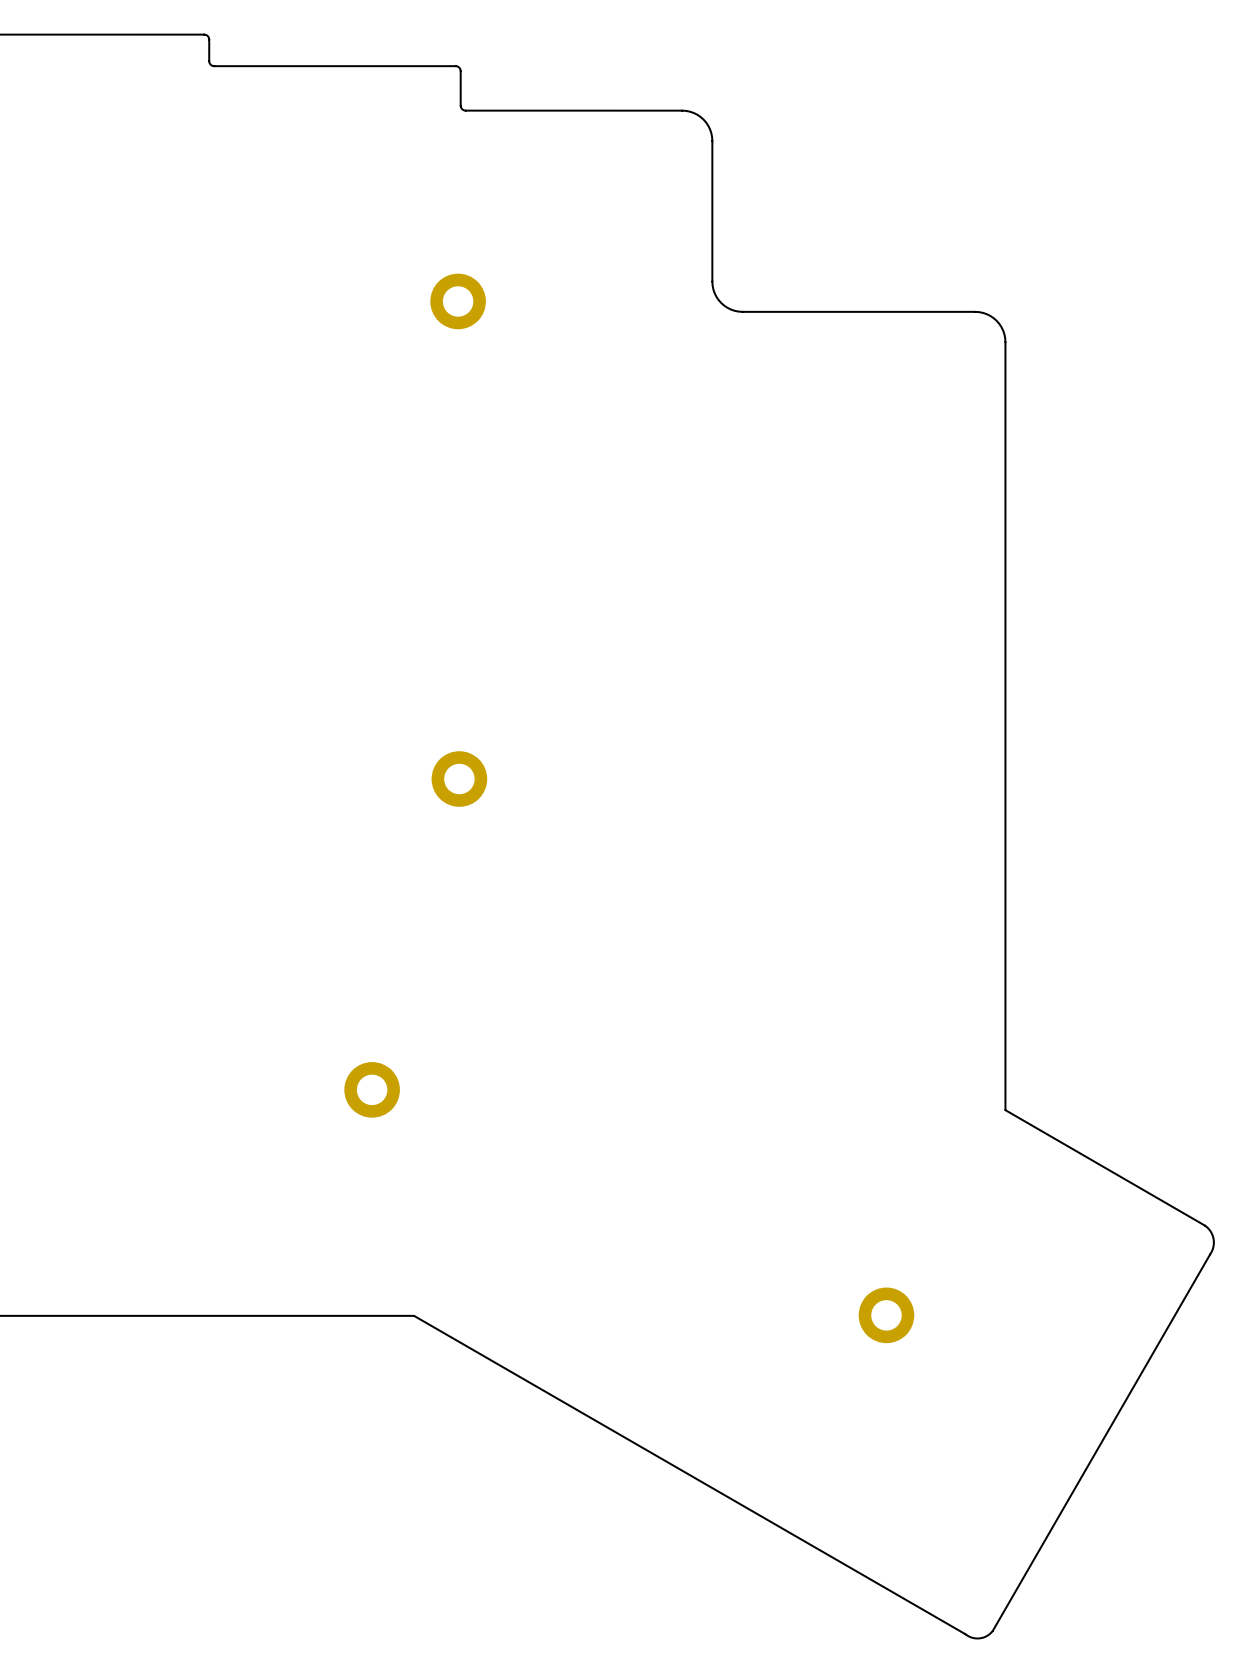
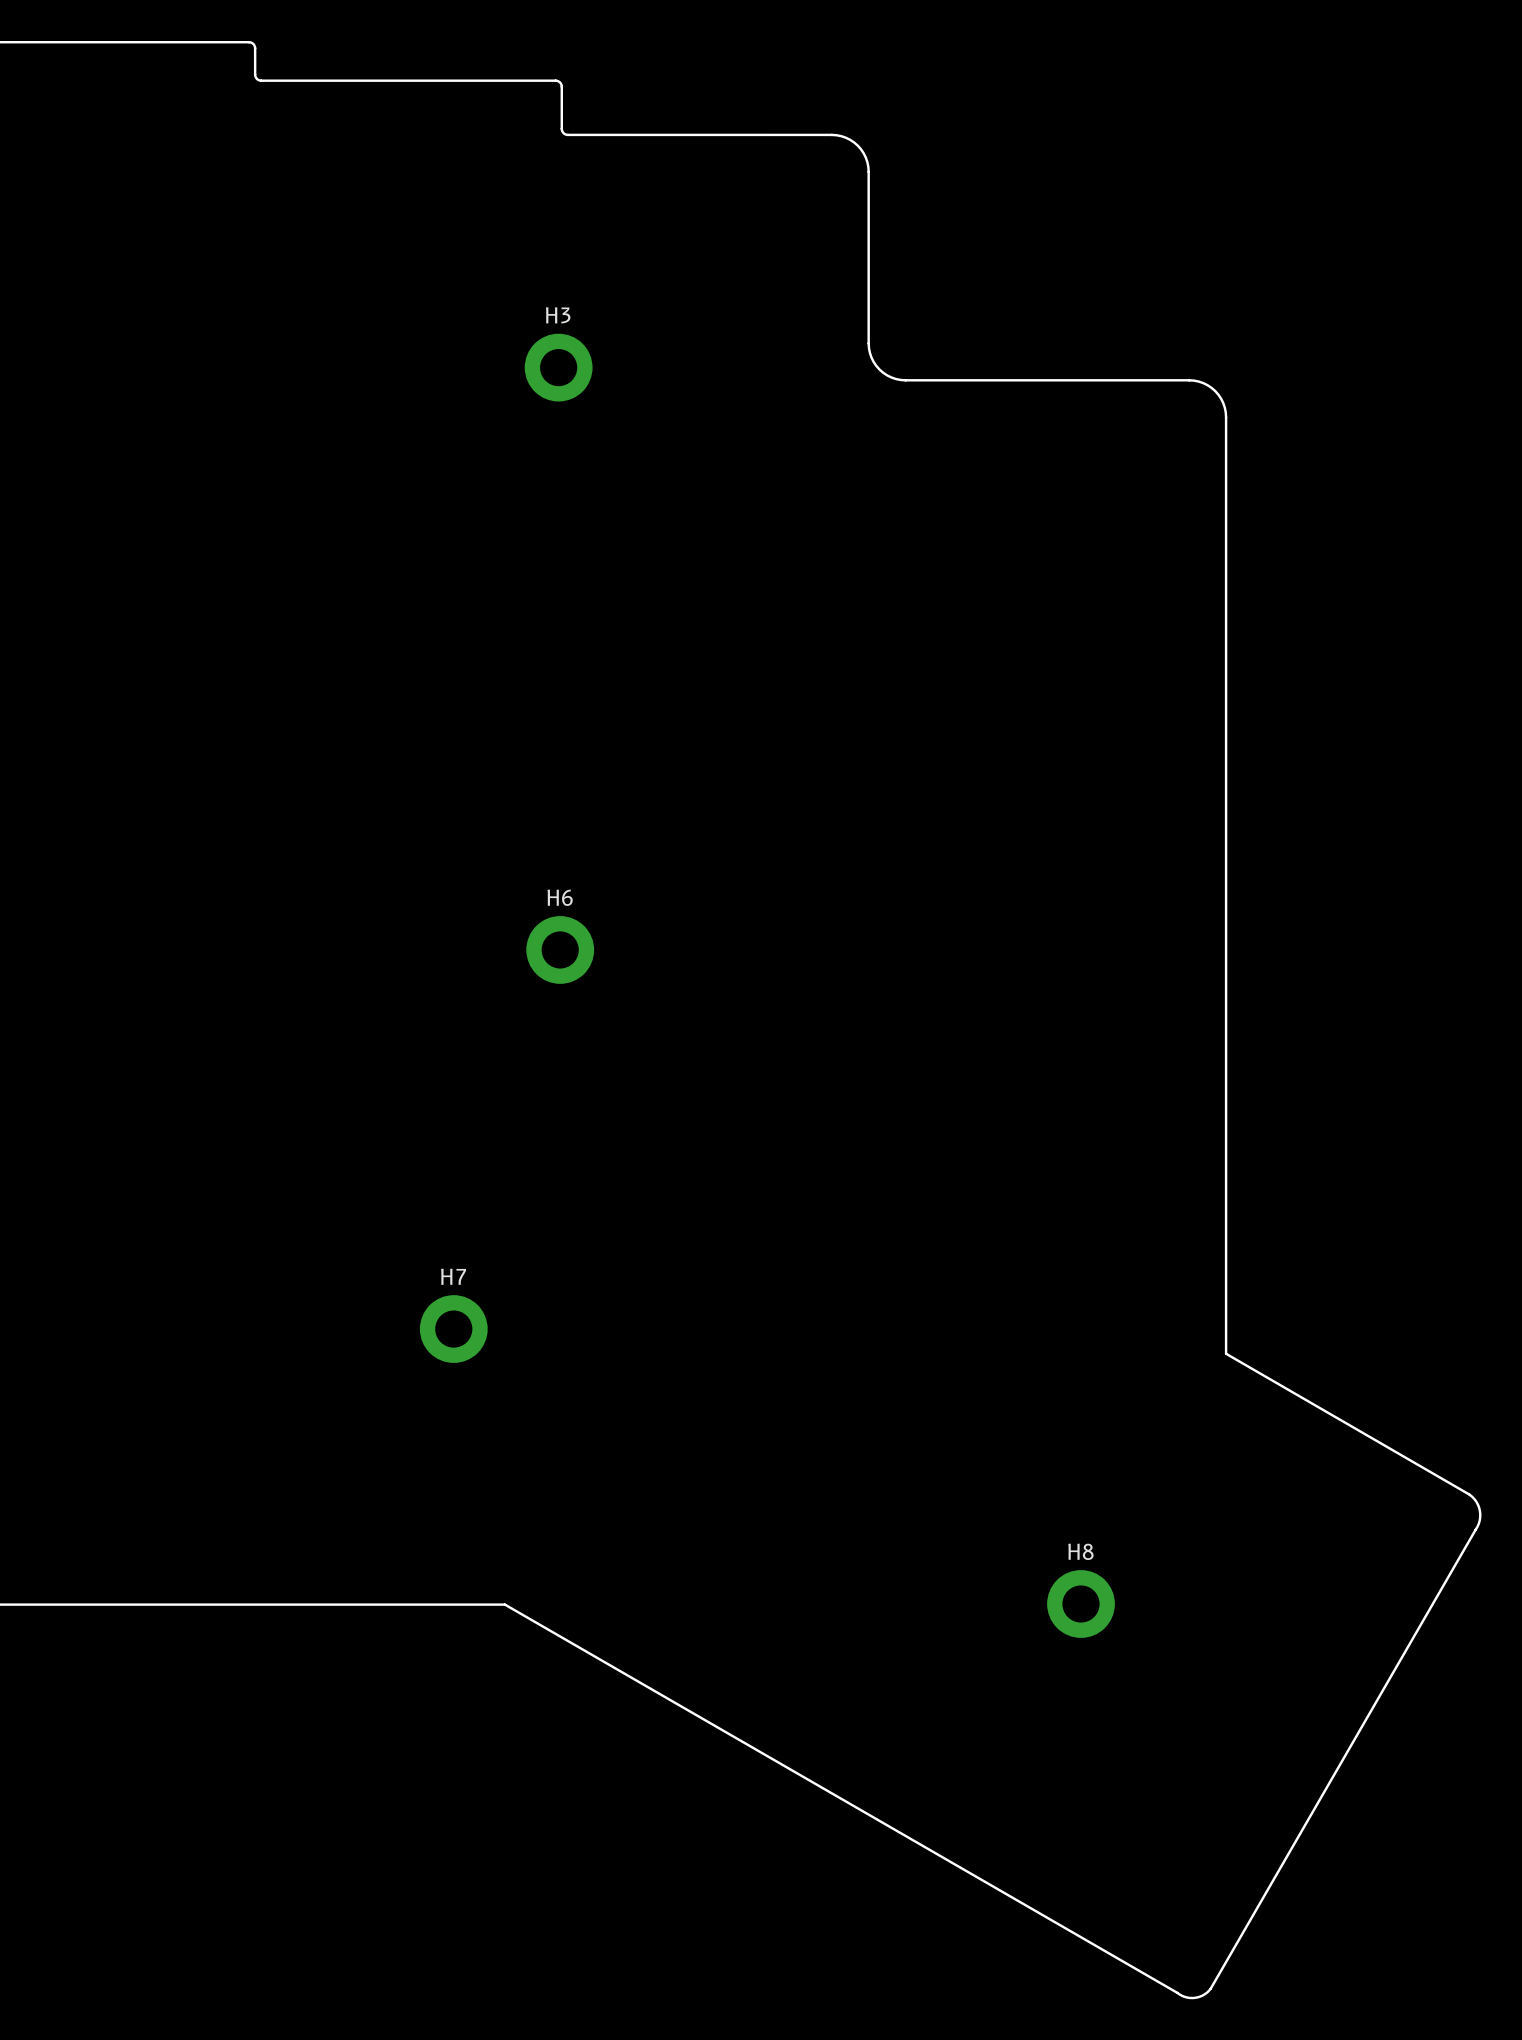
H3 name: none -> H3 (558, 315)
H6 name: none -> H6 (560, 897)
H7 name: none -> H7 (453, 1276)
H8 name: none -> H8 (1080, 1551)

